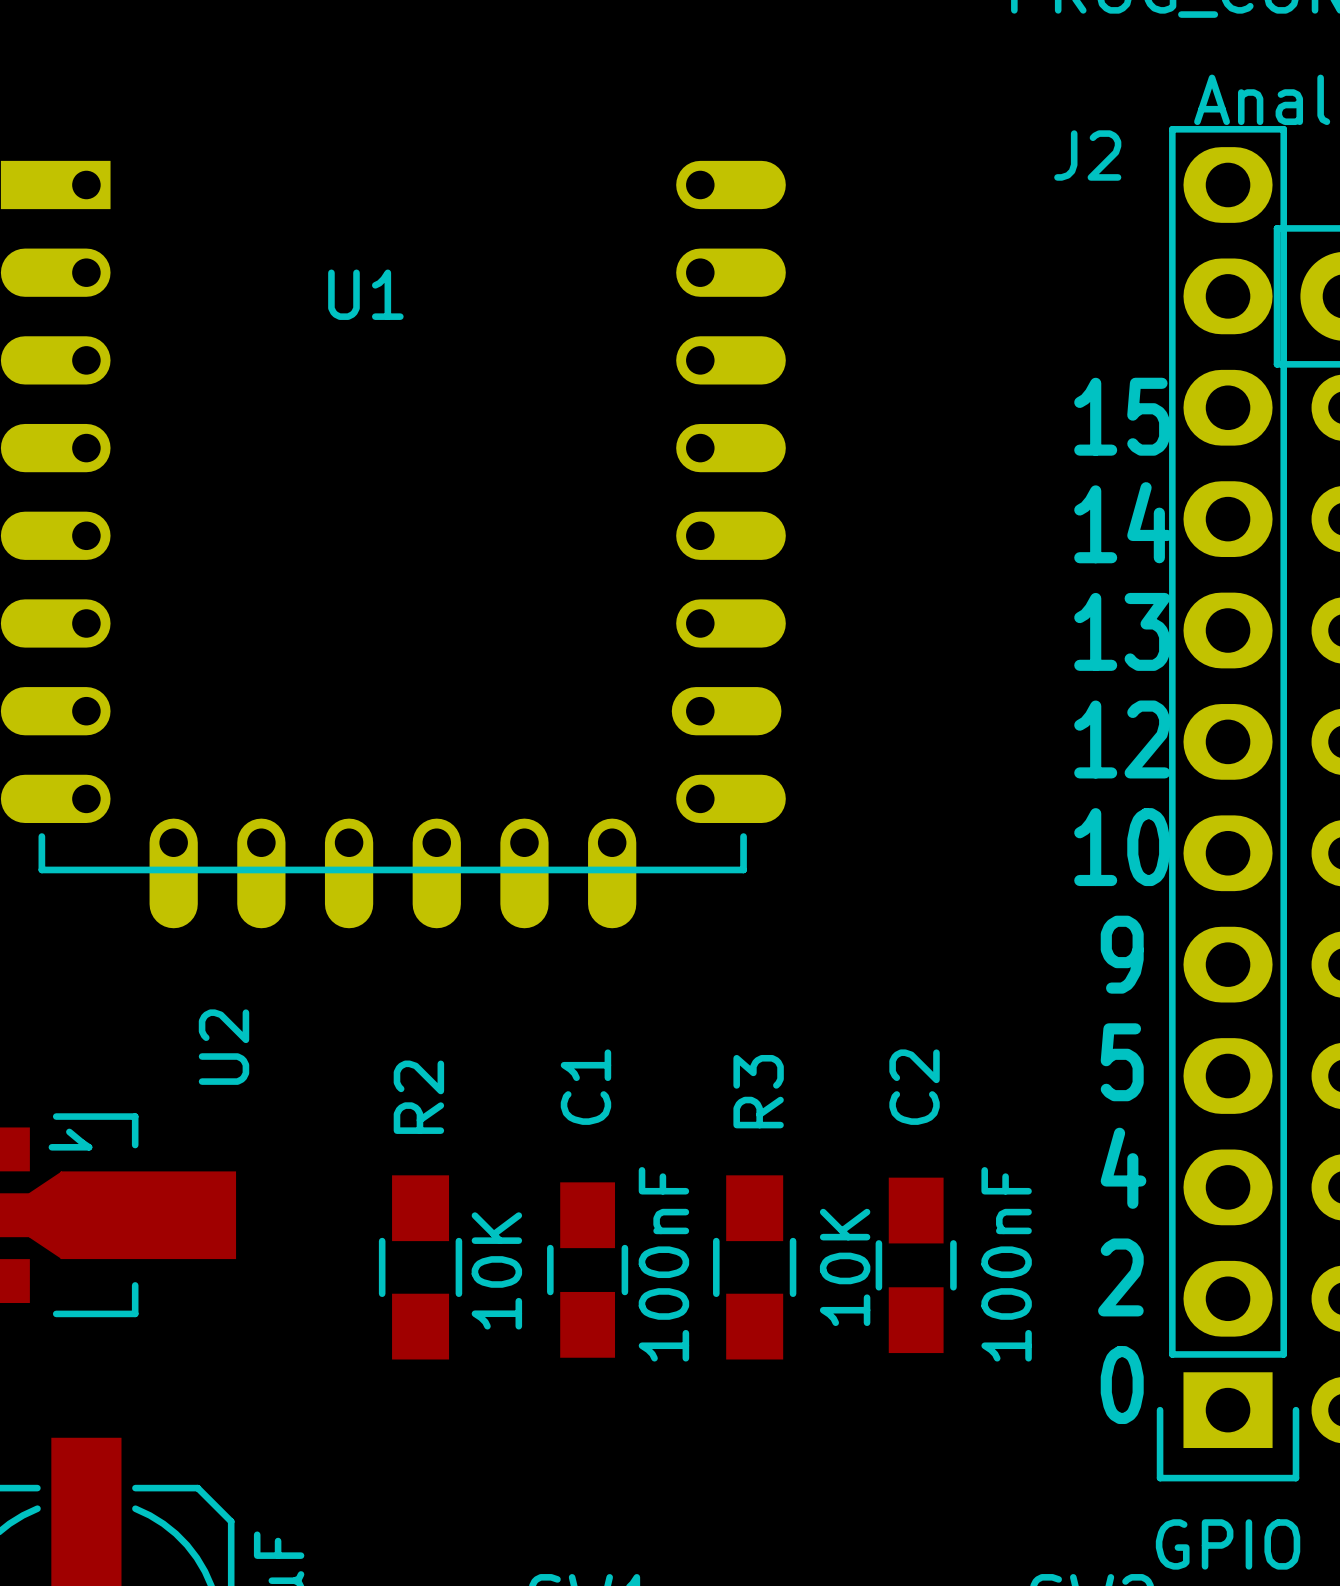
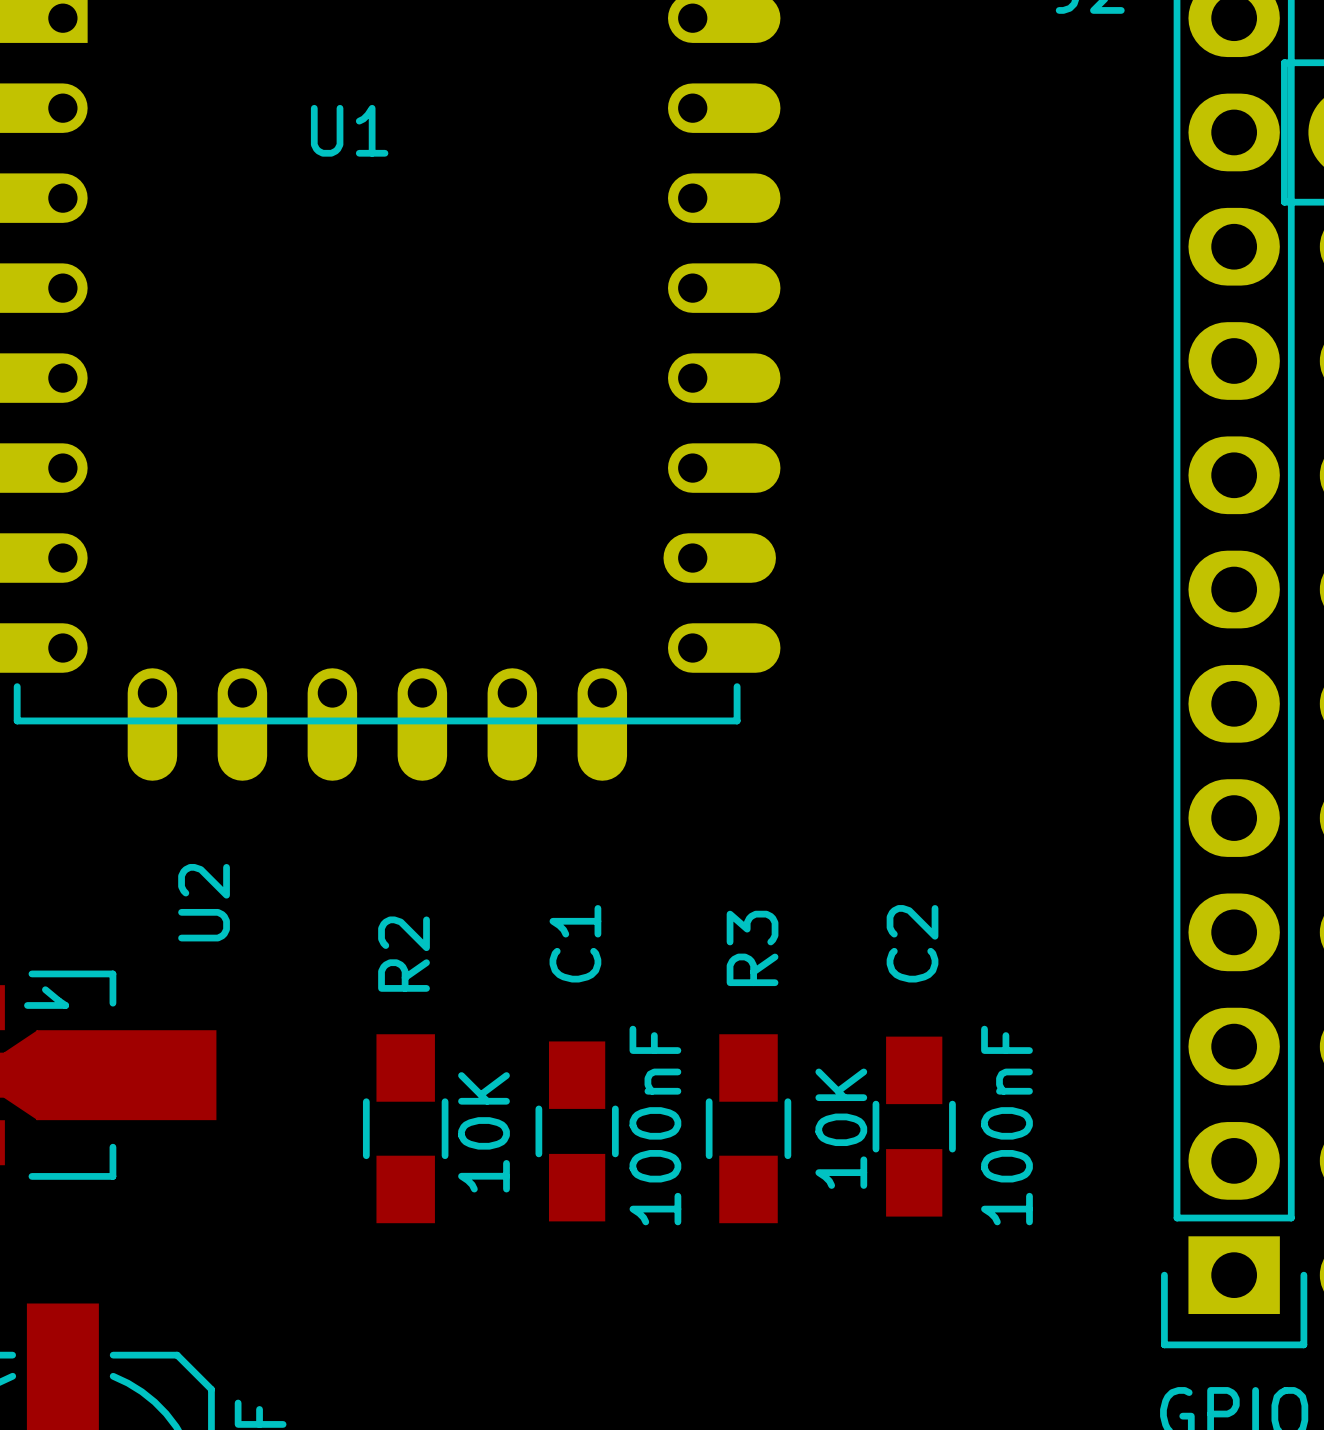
text: 15 (1122, 416) -> none
text: 14 (1123, 522) -> none
text: 13 (1122, 631) -> none
text: 12 (1122, 739) -> none
text: 10 (1122, 847) -> none
text: 9 (1122, 954) -> none
text: 5 (1122, 1062) -> none
text: 4 (1123, 1168) -> none
text: 2 (1120, 1277) -> none
text: 0 (1122, 1385) -> none

